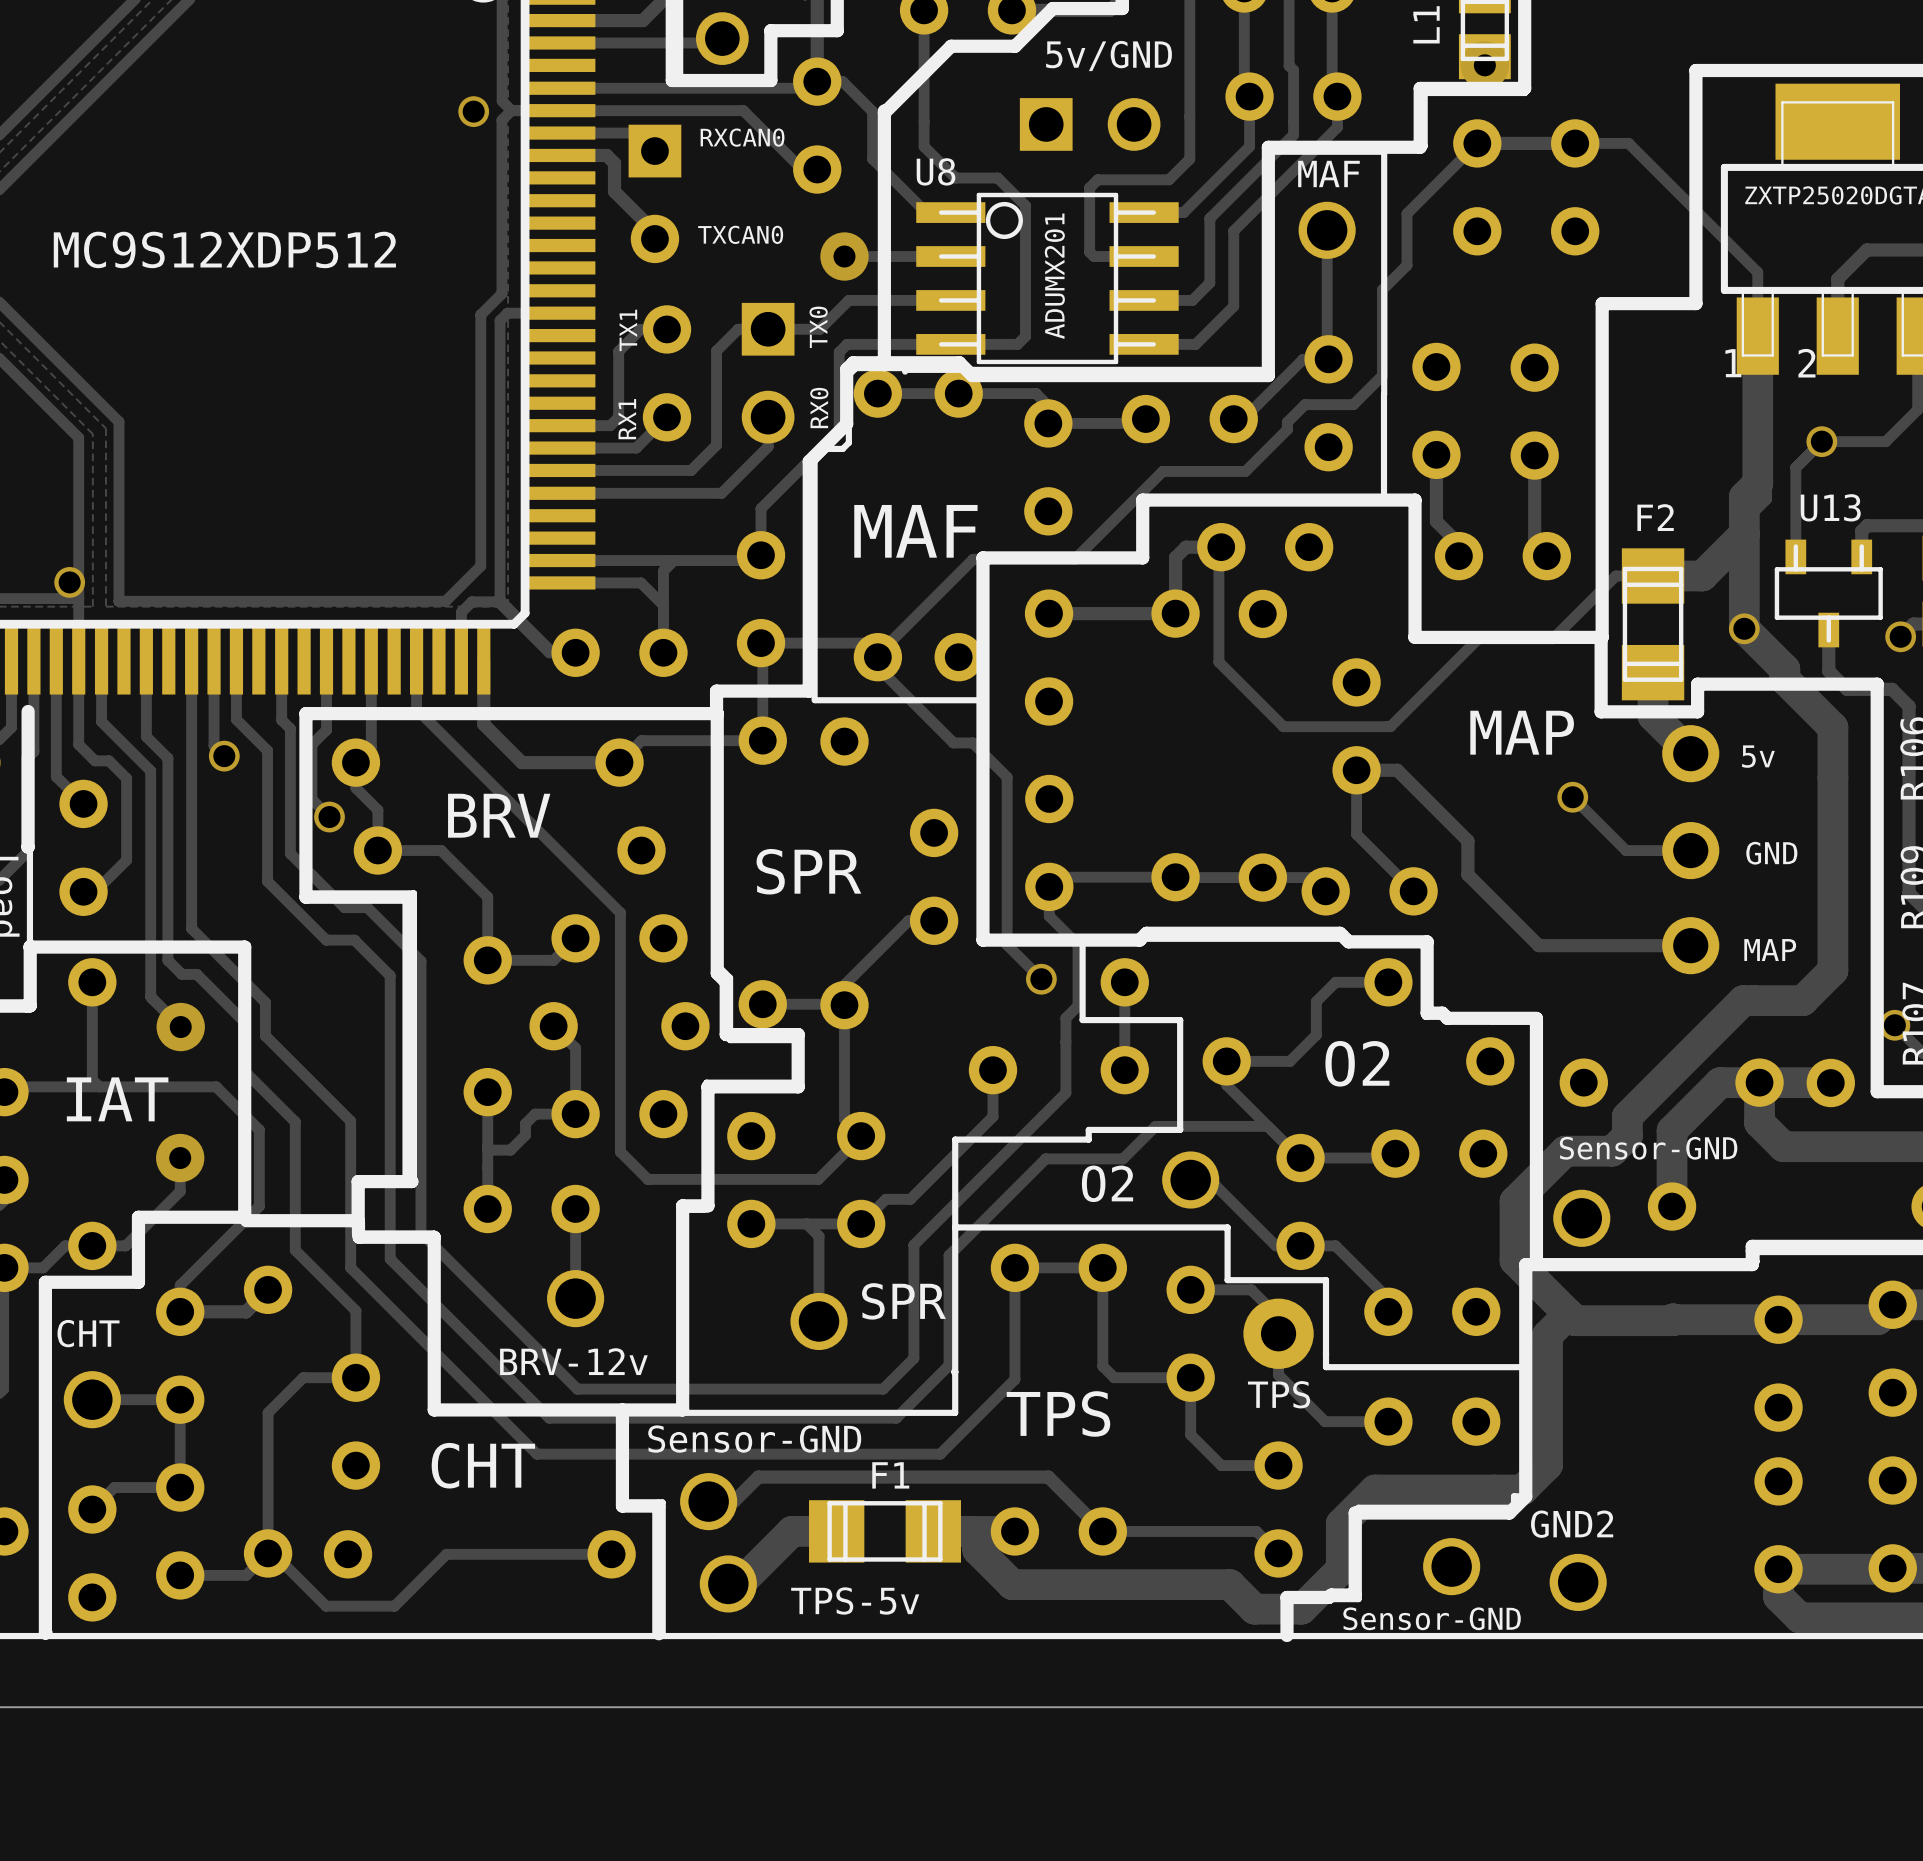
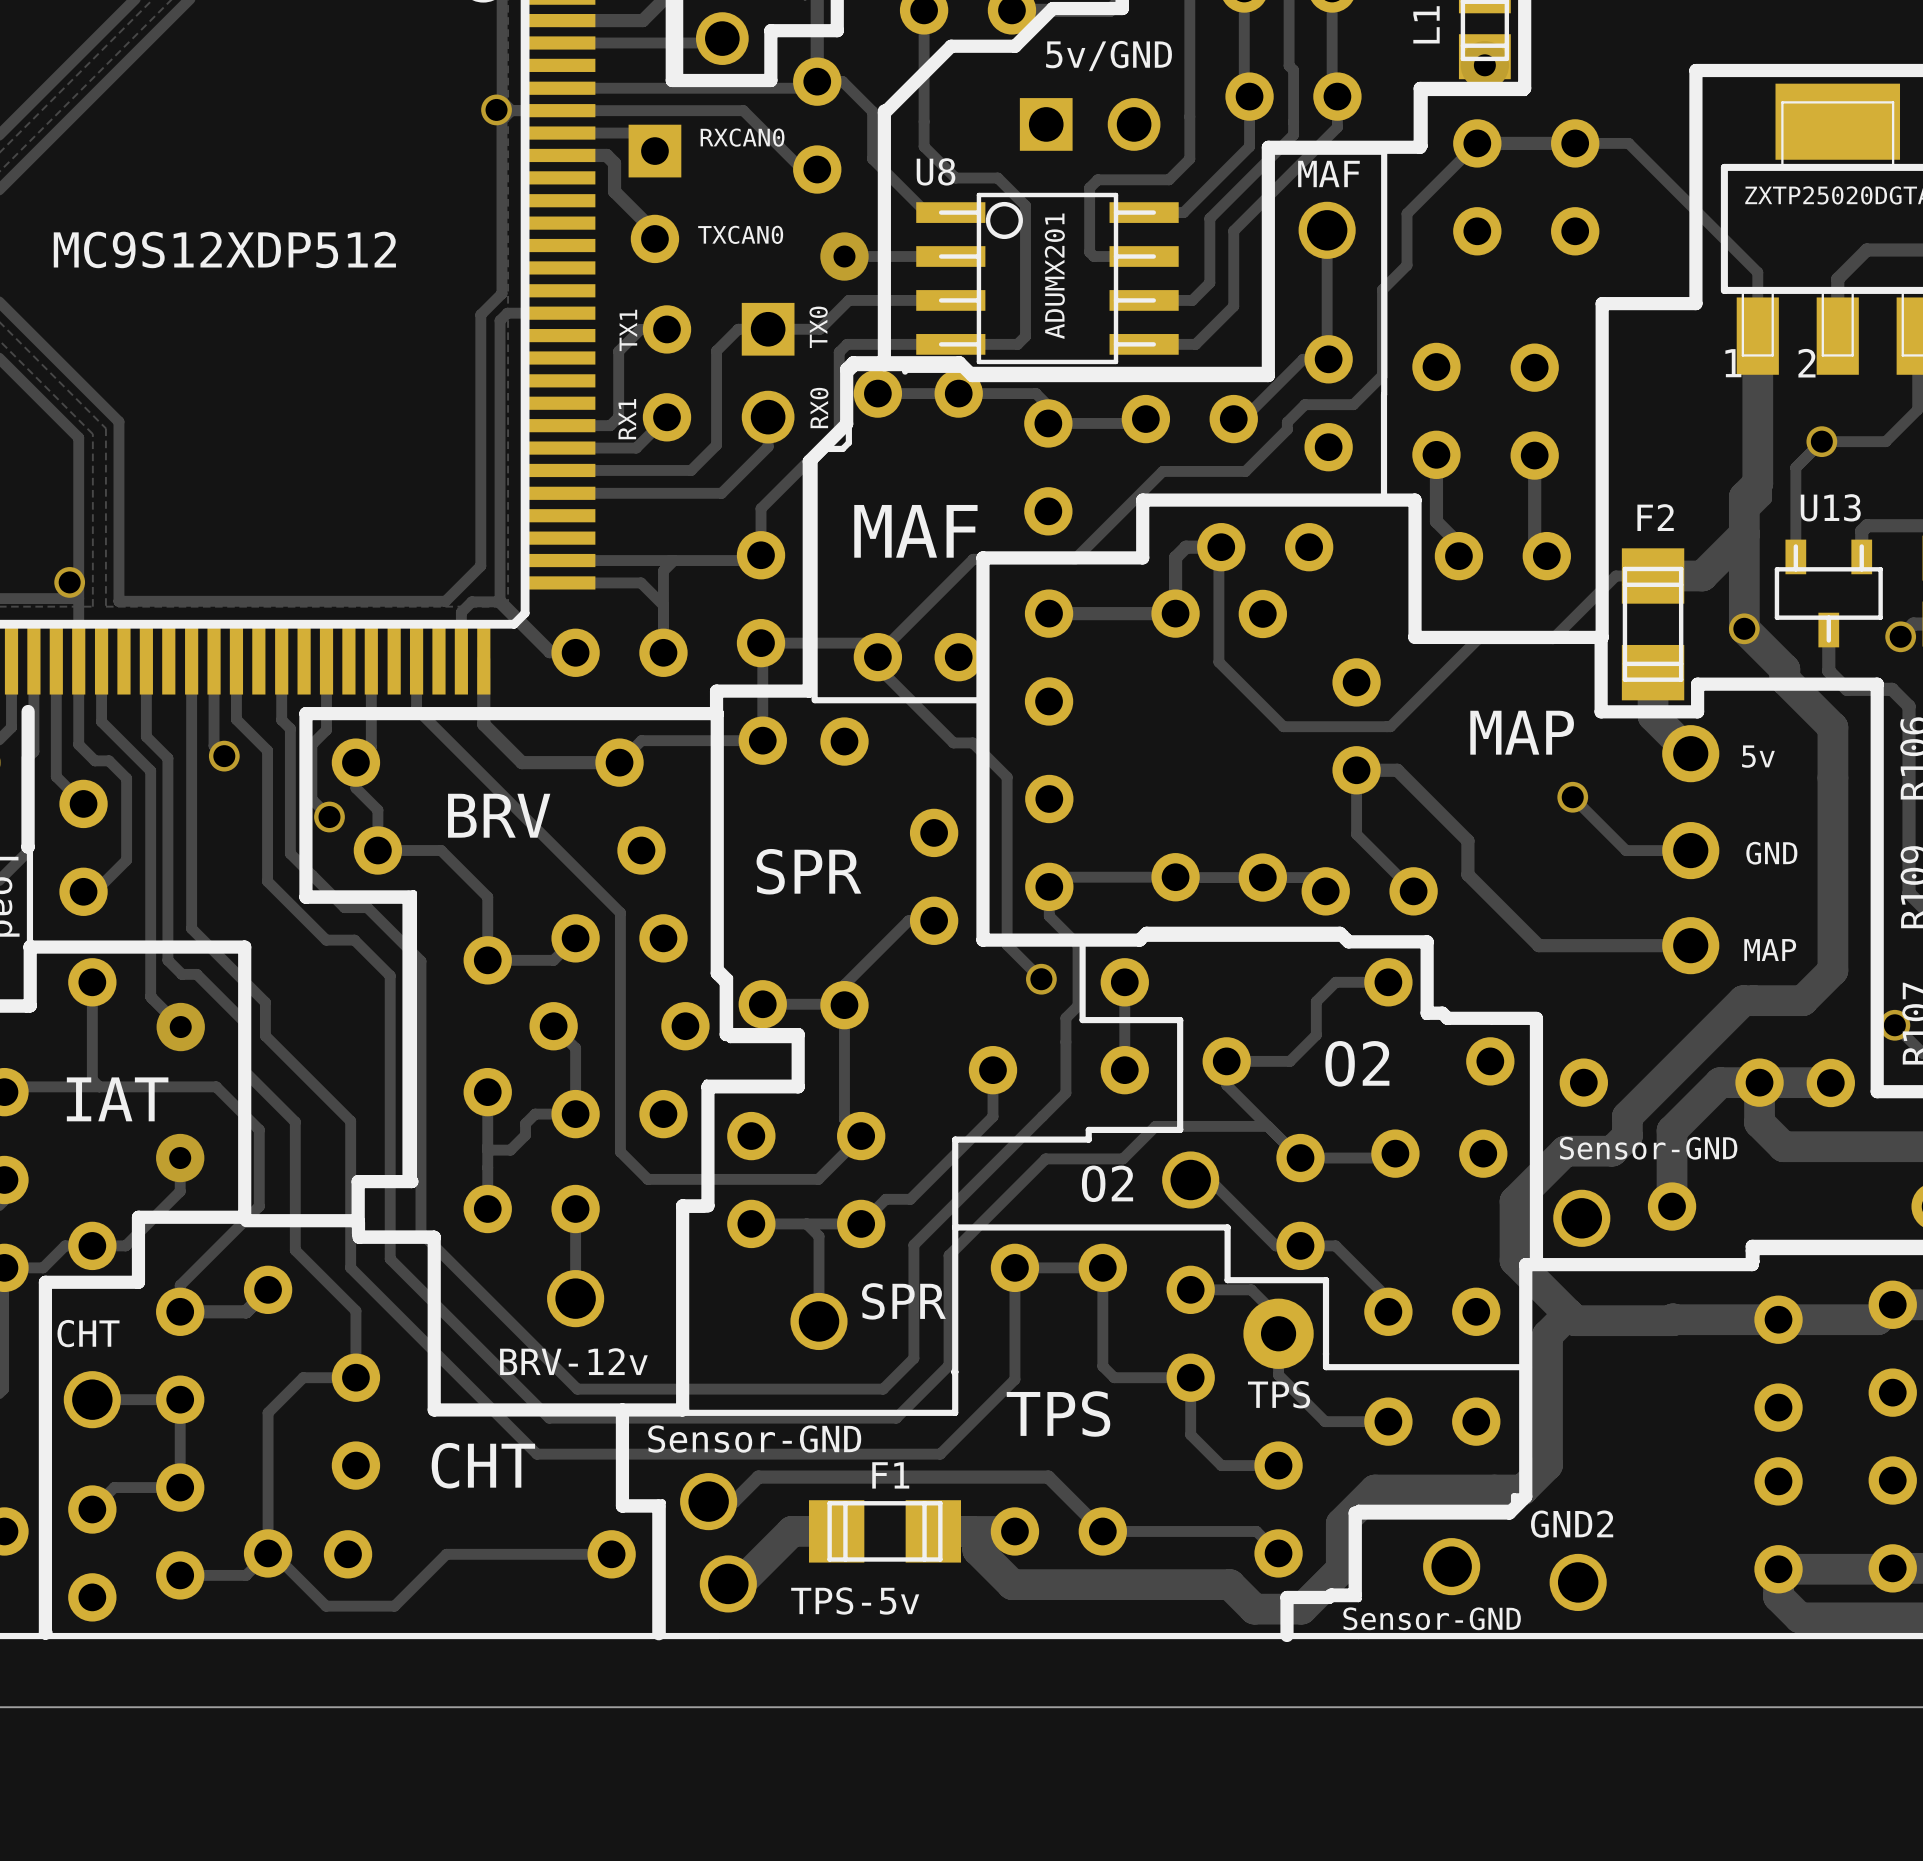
via position: (473, 111) -> (496, 109)

